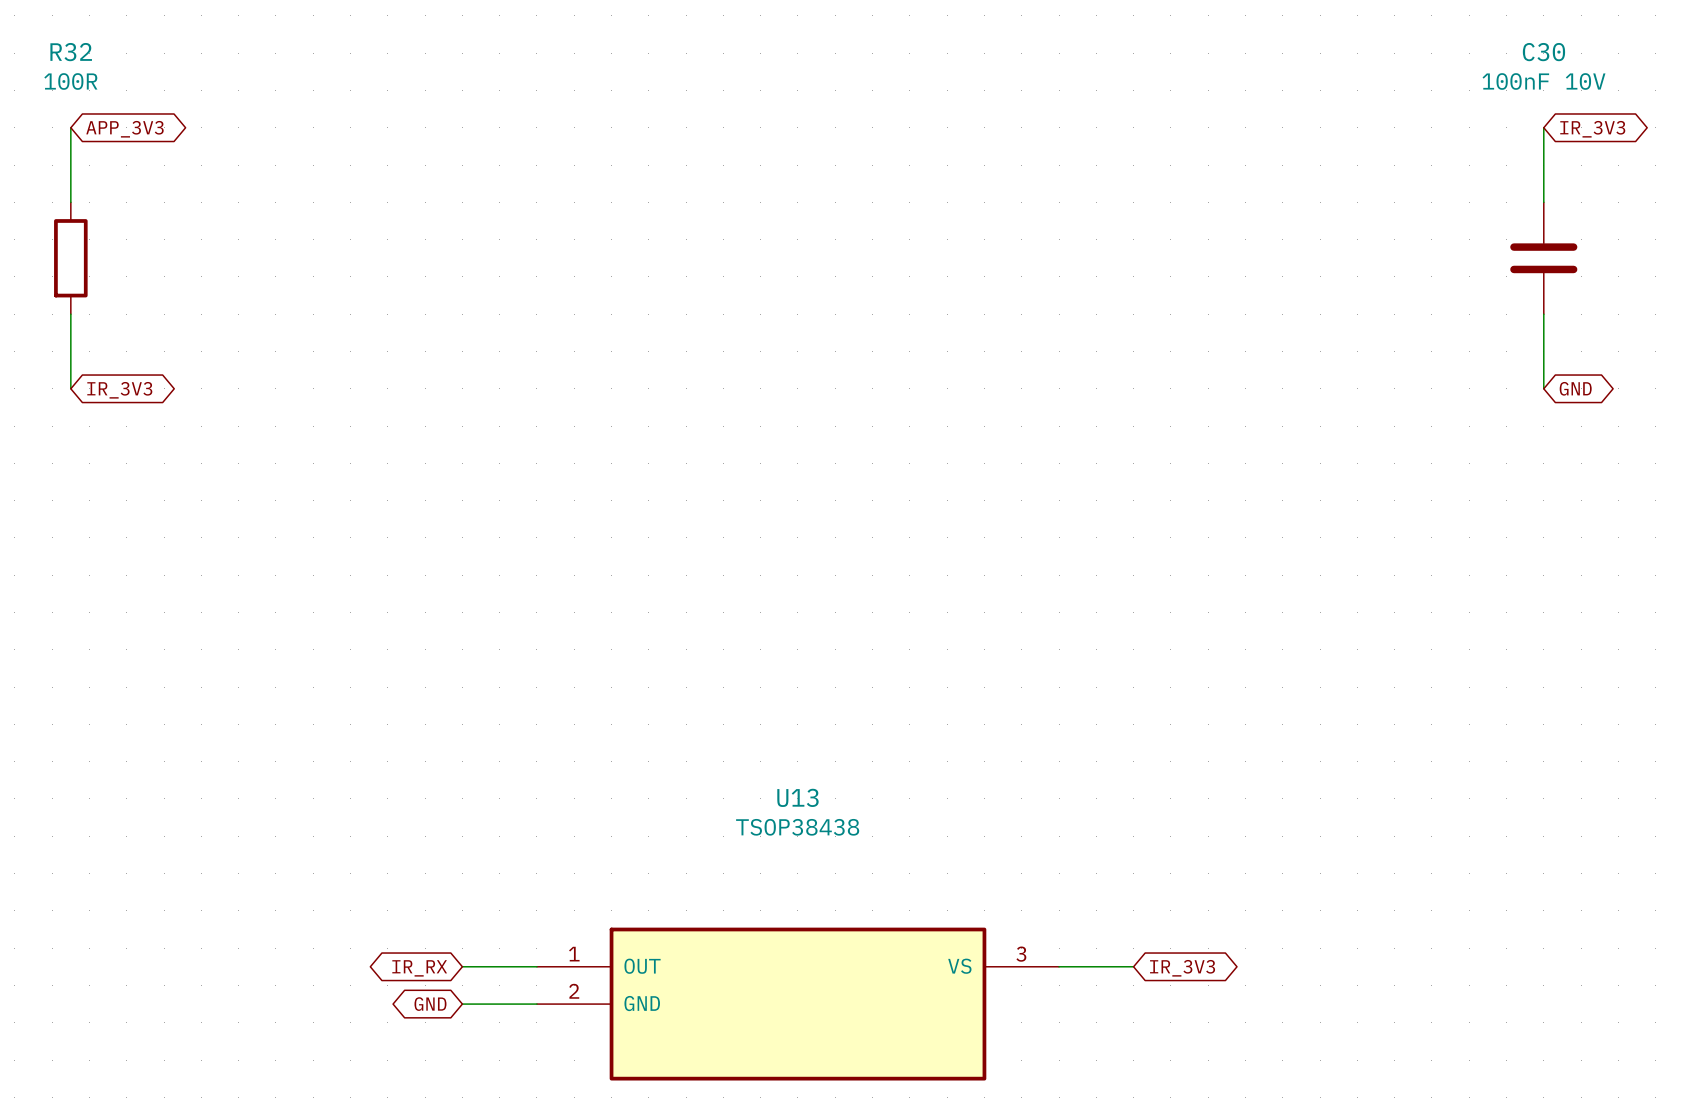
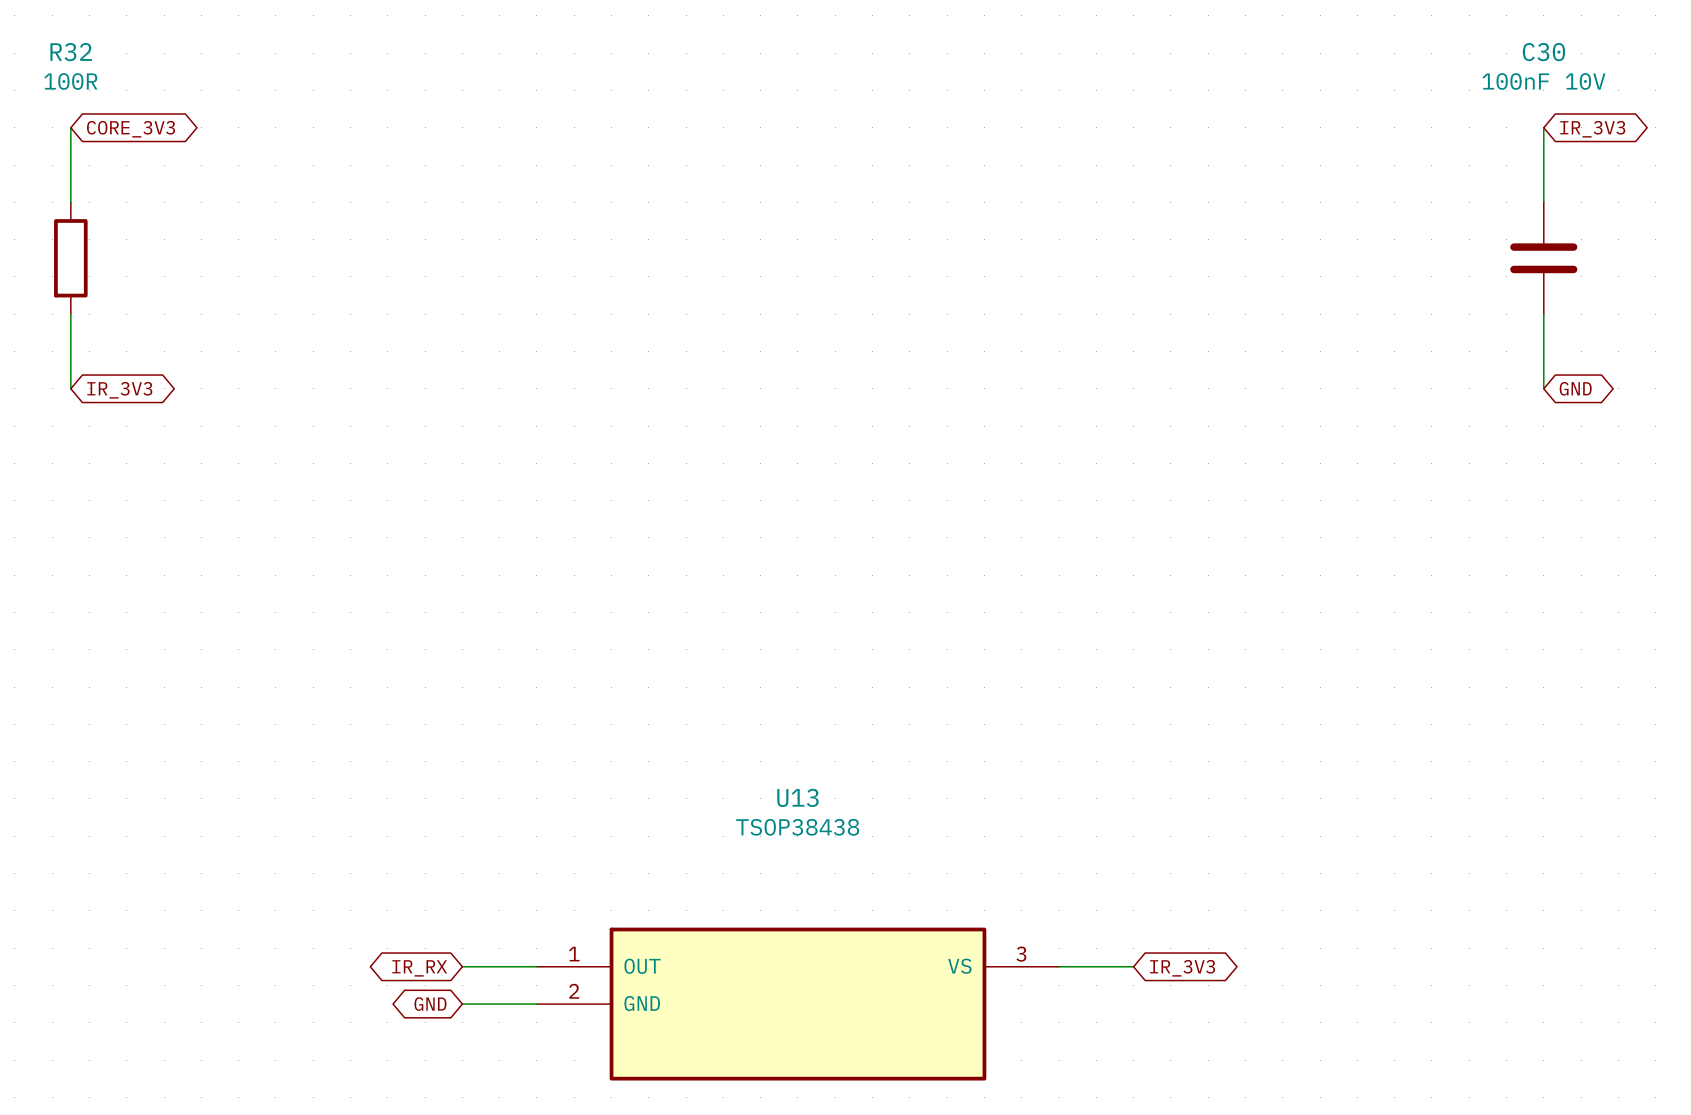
global label: APP_3V3 (124, 129) -> CORE_3V3 (131, 129)

